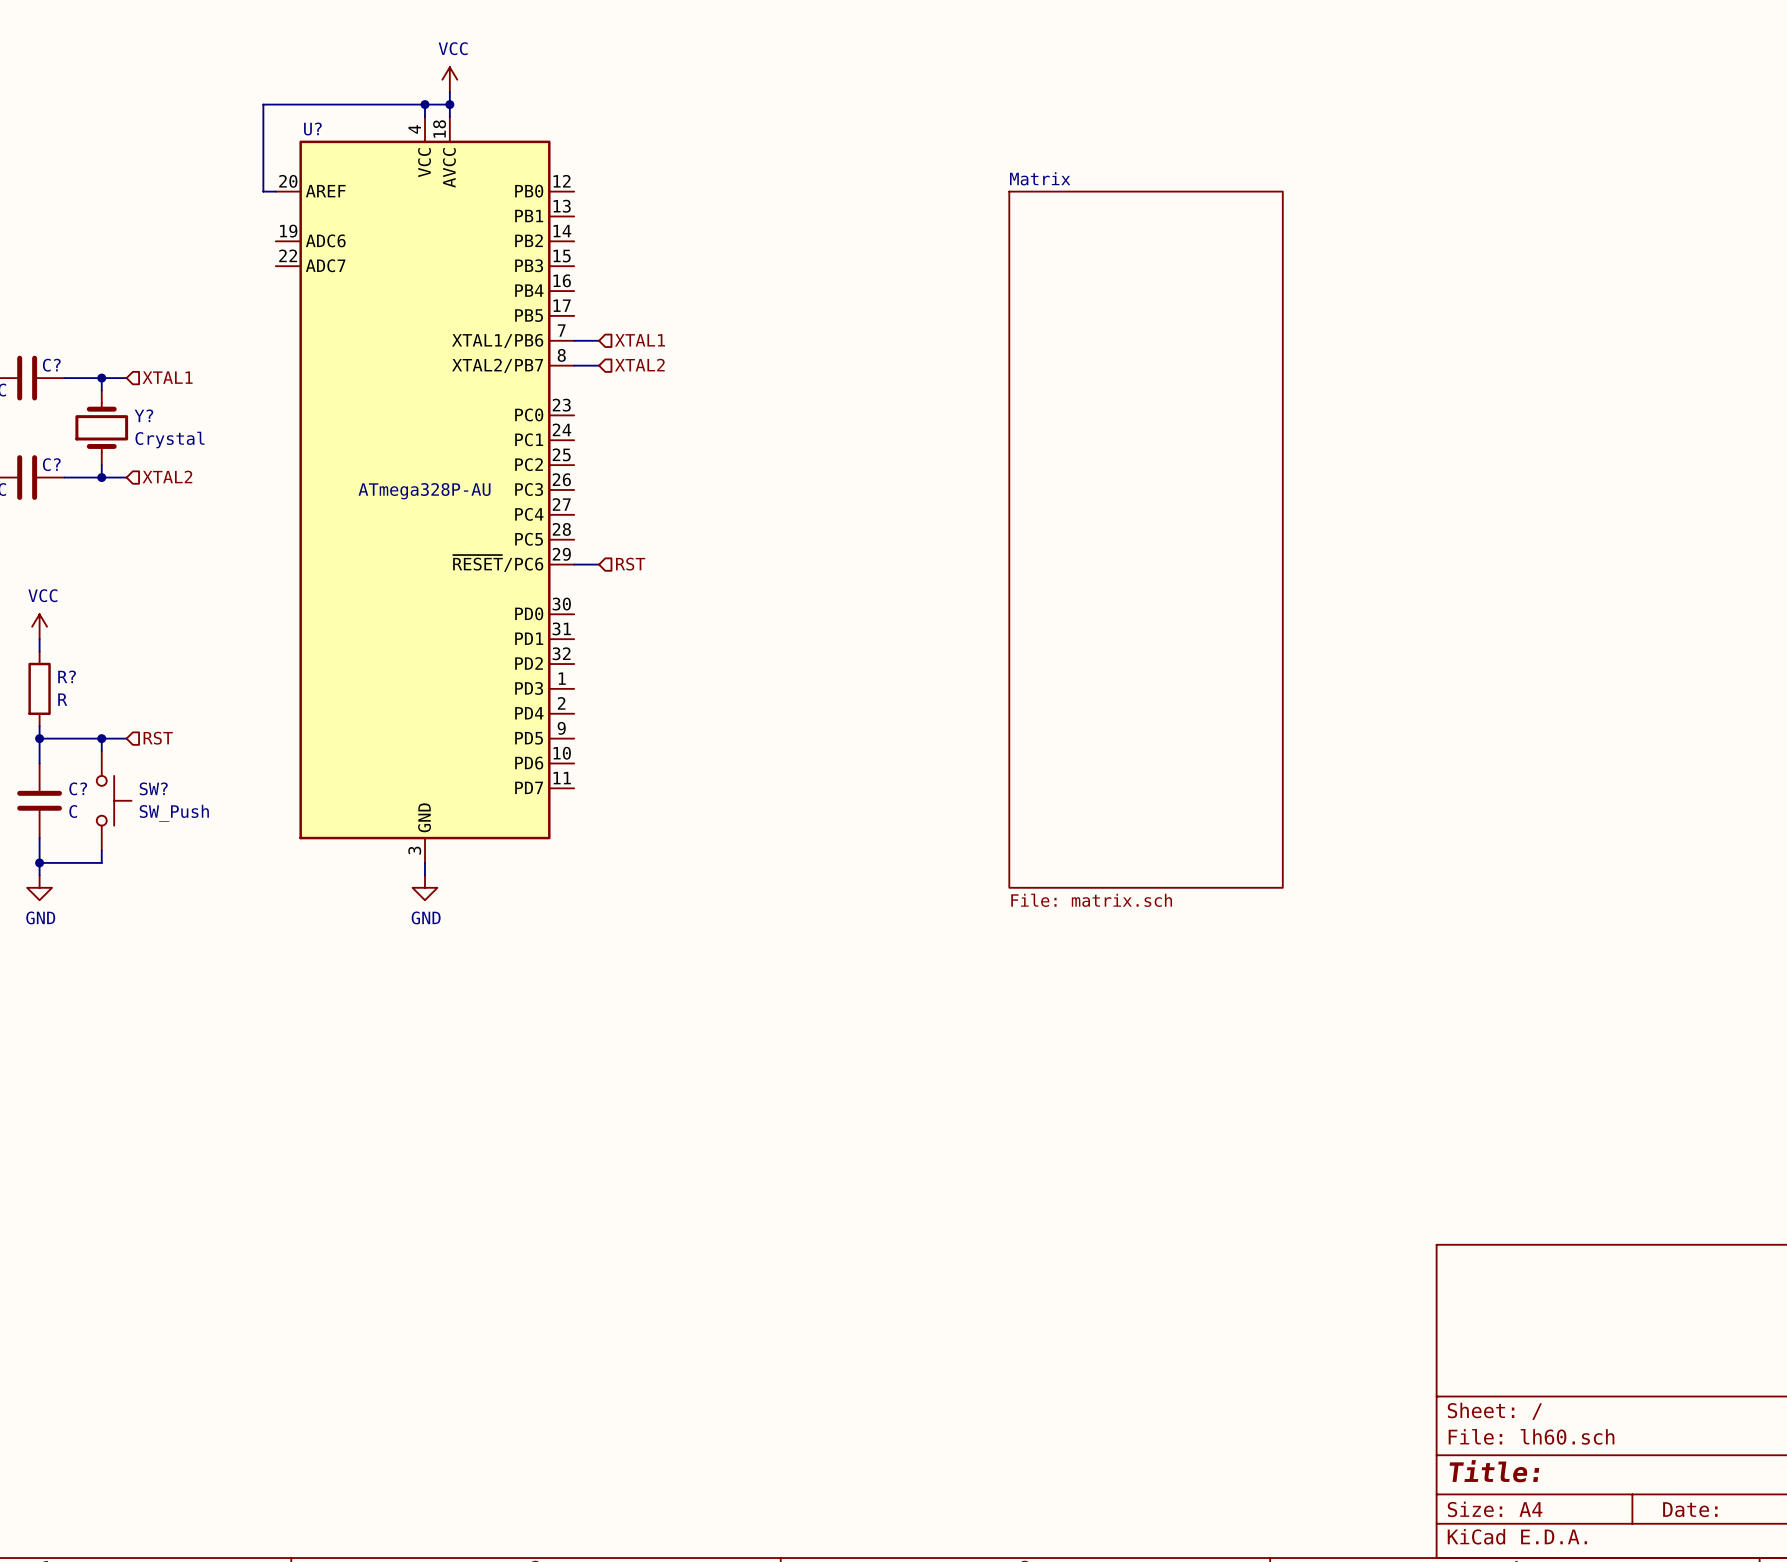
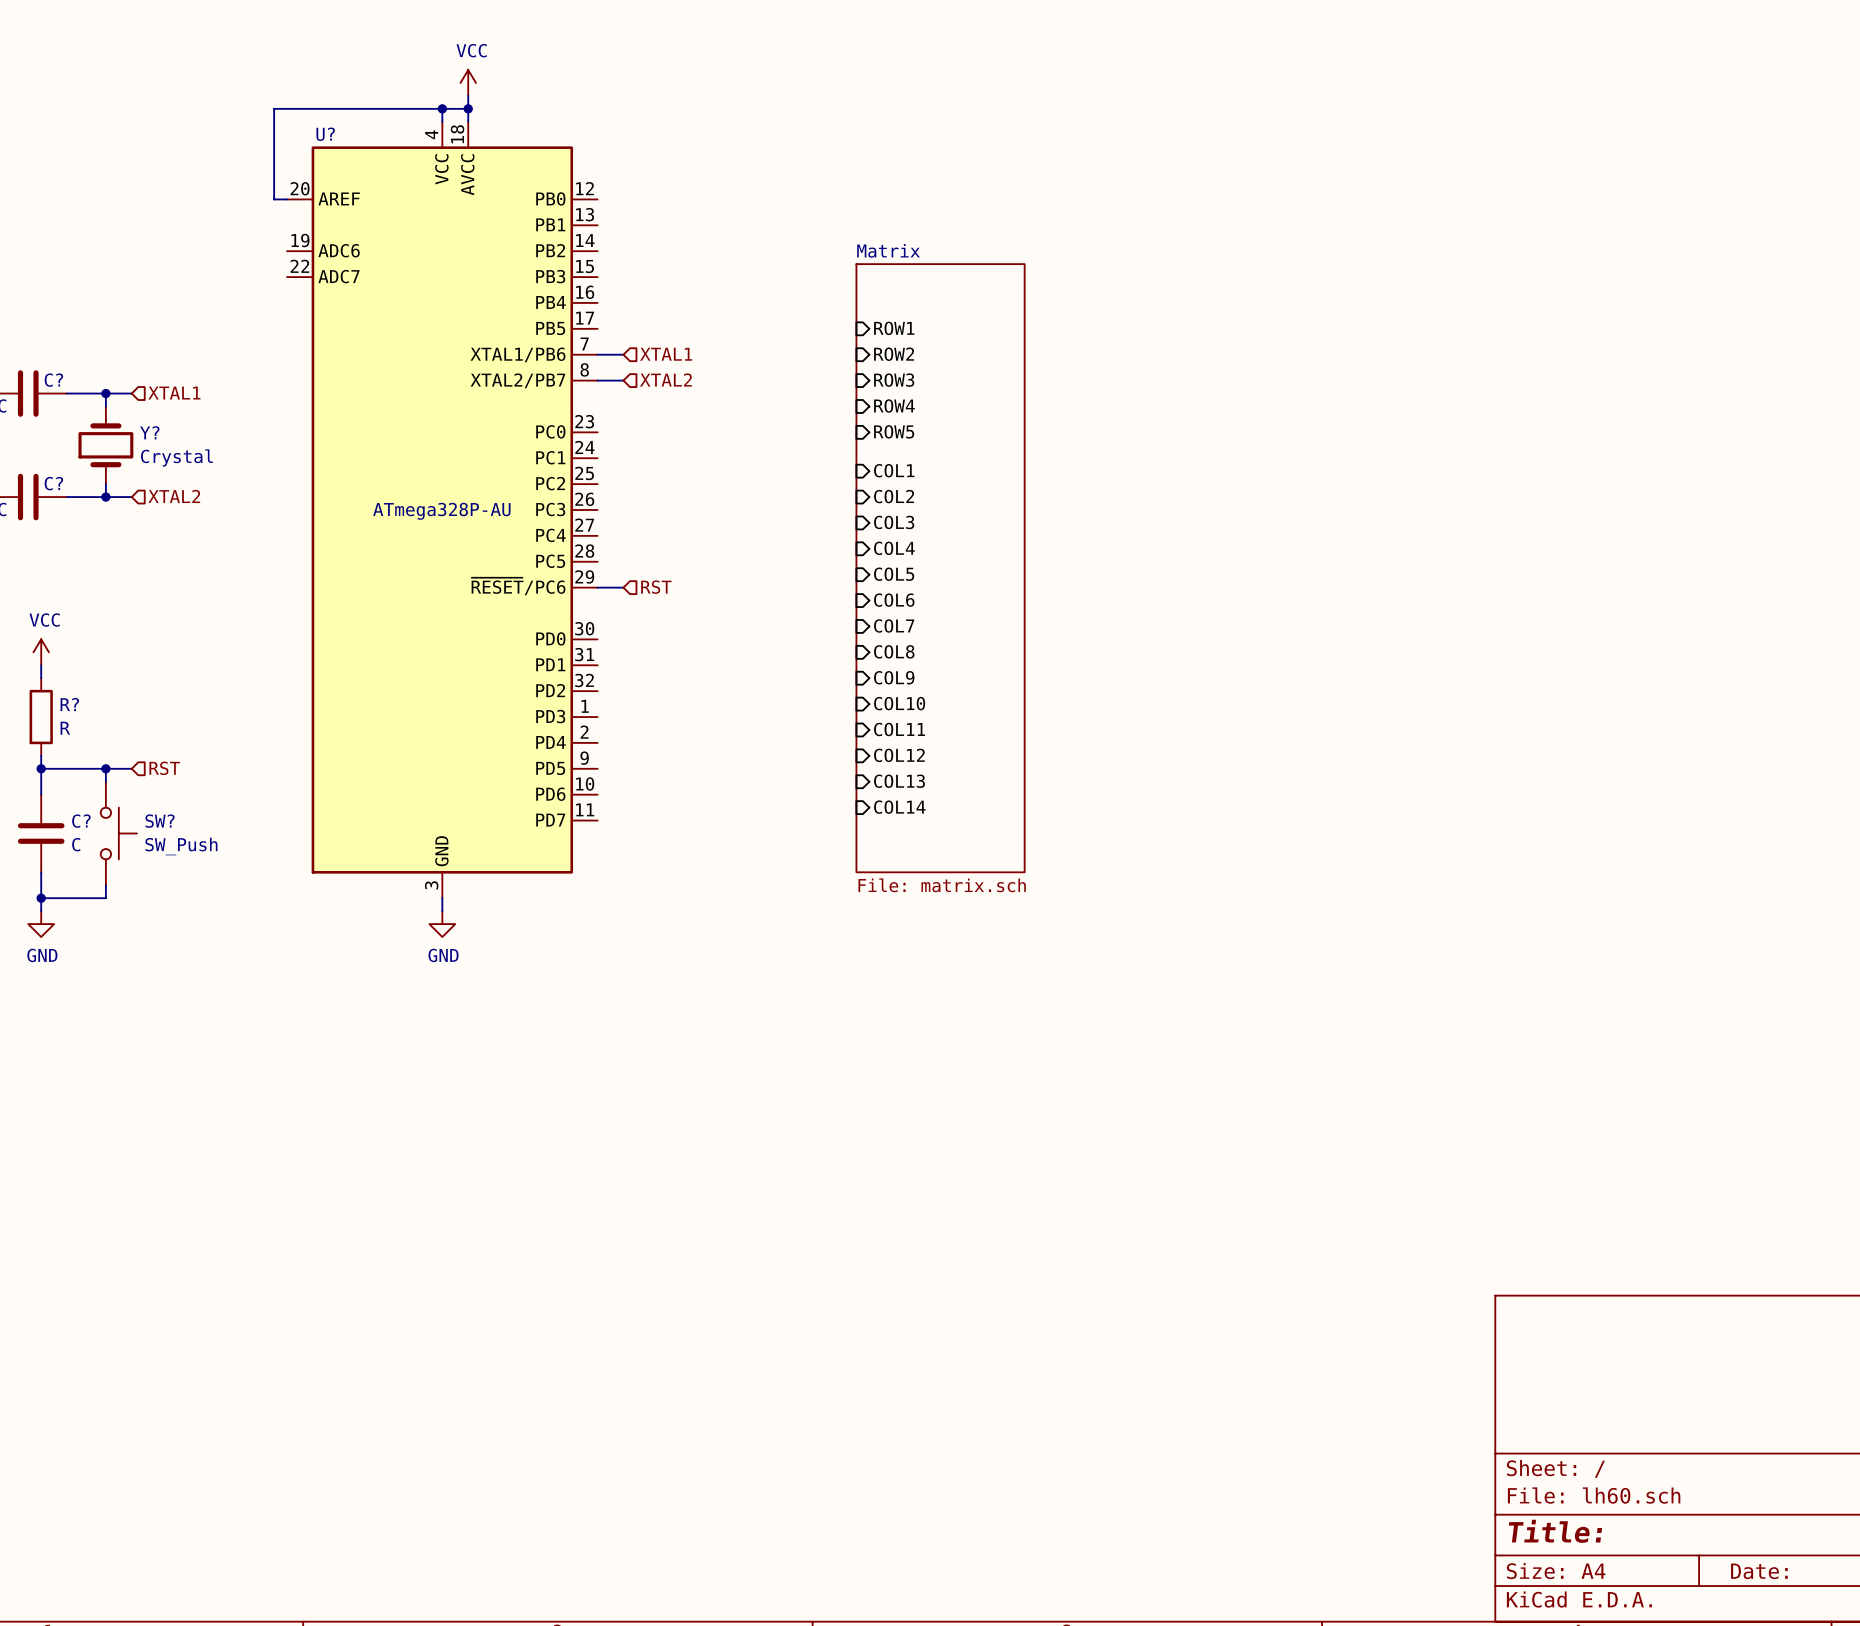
sheet pin: none -> ROW1 (894, 328)
sheet pin: none -> ROW2 (894, 354)
sheet pin: none -> ROW3 (894, 380)
sheet pin: none -> ROW4 (894, 406)
sheet pin: none -> ROW5 (894, 431)
sheet pin: none -> COL1 (894, 470)
sheet pin: none -> COL2 (894, 496)
sheet pin: none -> COL3 (894, 522)
sheet pin: none -> COL4 (894, 548)
sheet Matrix: File: matrix.sch (1146, 539) -> none
sheet Matrix: none -> File: matrix.sch (940, 568)
sheet pin: none -> COL5 (894, 574)
sheet pin: none -> COL6 (894, 600)
sheet pin: none -> COL7 (894, 625)
sheet pin: none -> COL8 (894, 651)
sheet pin: none -> COL9 (894, 677)
sheet pin: none -> COL10 (899, 703)
sheet pin: none -> COL11 (899, 729)
sheet pin: none -> COL12 (899, 755)
sheet pin: none -> COL13 (899, 781)
sheet pin: none -> COL14 (899, 807)

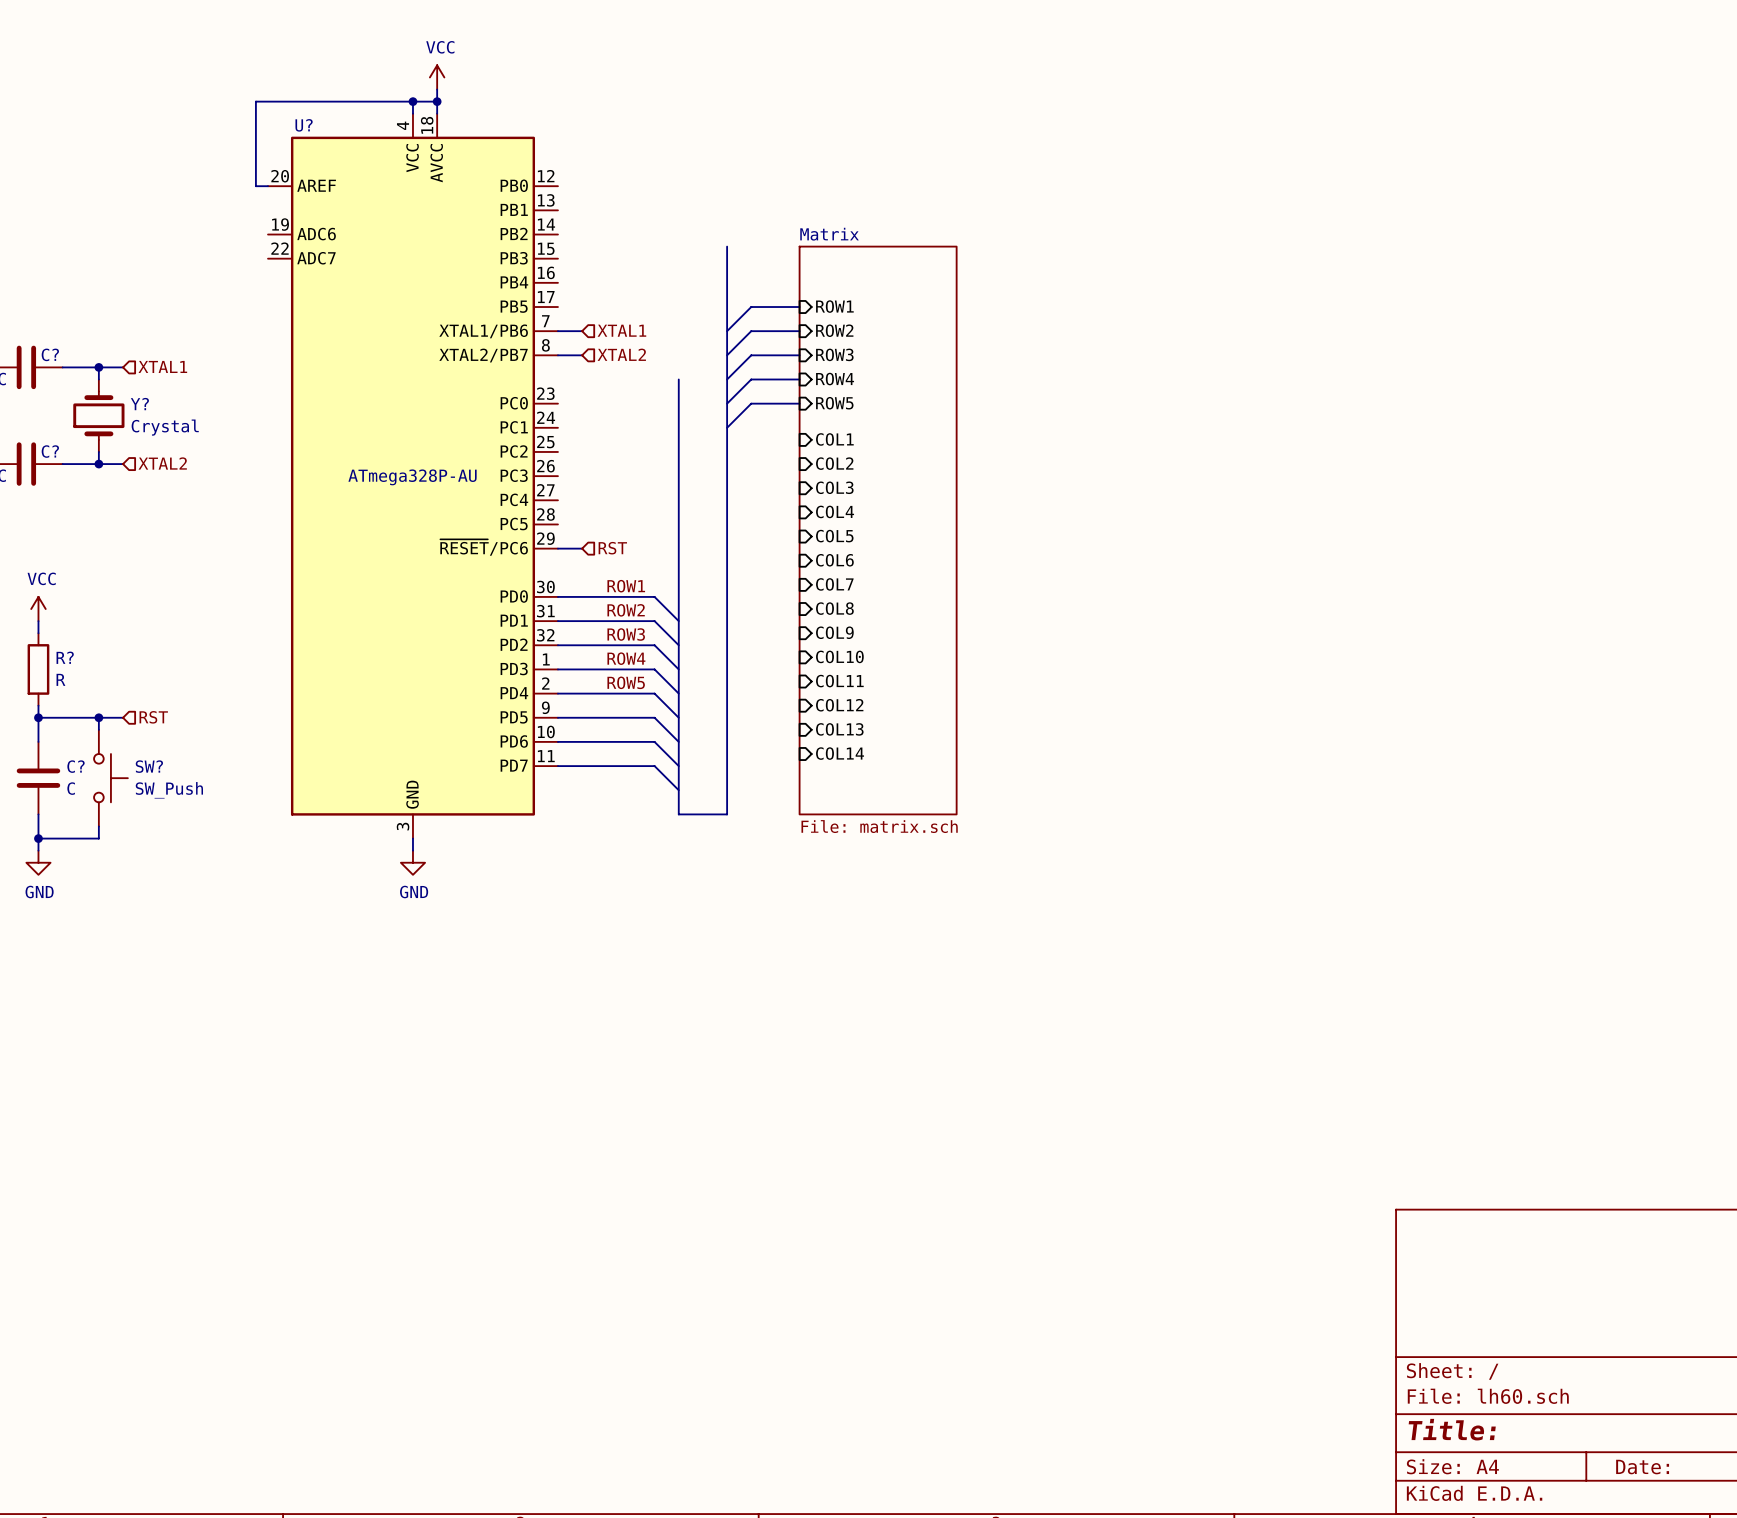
bus: none -> (727, 246) (727, 814) (678, 814) (678, 379)
wire: none -> (799, 307) (751, 307) (727, 331)
wire: none -> (799, 331) (751, 331) (727, 355)
wire: none -> (799, 355) (751, 355) (727, 379)
wire: none -> (799, 379) (751, 379) (727, 403)
wire: none -> (799, 403) (751, 403) (727, 427)
label: none -> ROW1 (626, 586)
wire: none -> (557, 596) (654, 596) (678, 621)
label: none -> ROW2 (626, 610)
wire: none -> (557, 621) (654, 621) (678, 645)
label: none -> ROW3 (626, 634)
wire: none -> (557, 645) (654, 645) (678, 669)
label: none -> ROW4 (626, 658)
wire: none -> (557, 669) (654, 669) (678, 693)
label: none -> ROW5 (626, 682)
wire: none -> (557, 693) (654, 693) (678, 717)
wire: none -> (557, 717) (654, 717) (678, 741)
wire: none -> (557, 741) (654, 741) (678, 766)
wire: none -> (557, 766) (654, 766) (678, 790)

